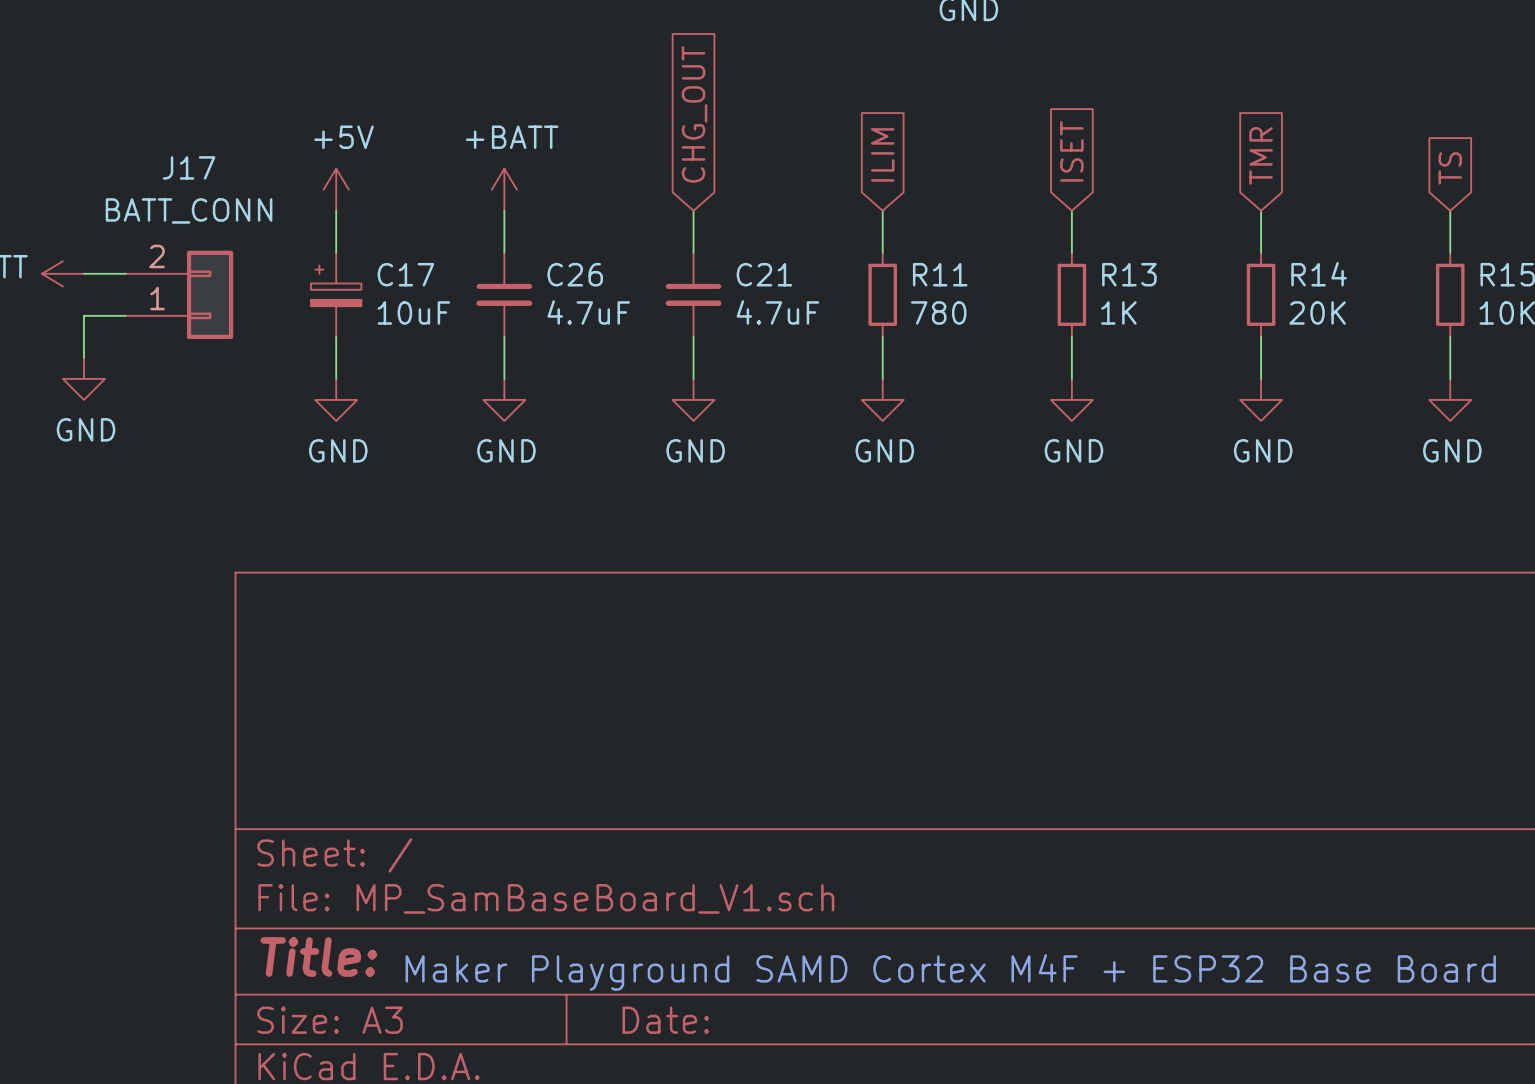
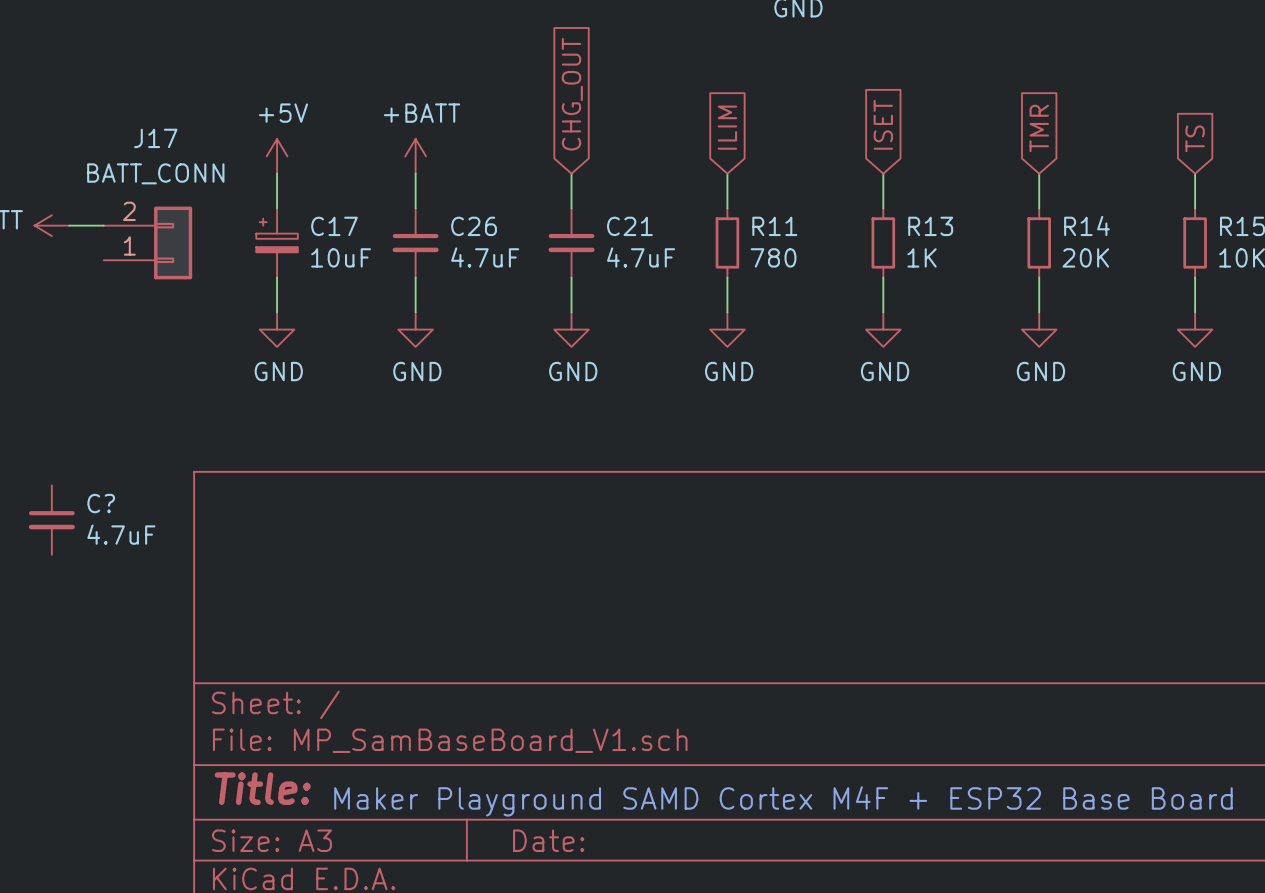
wire: (126, 315) (83, 315) (83, 357) -> none
power symbol: GND (83, 378) -> none
C?: none -> 4.7uF (51, 520)

